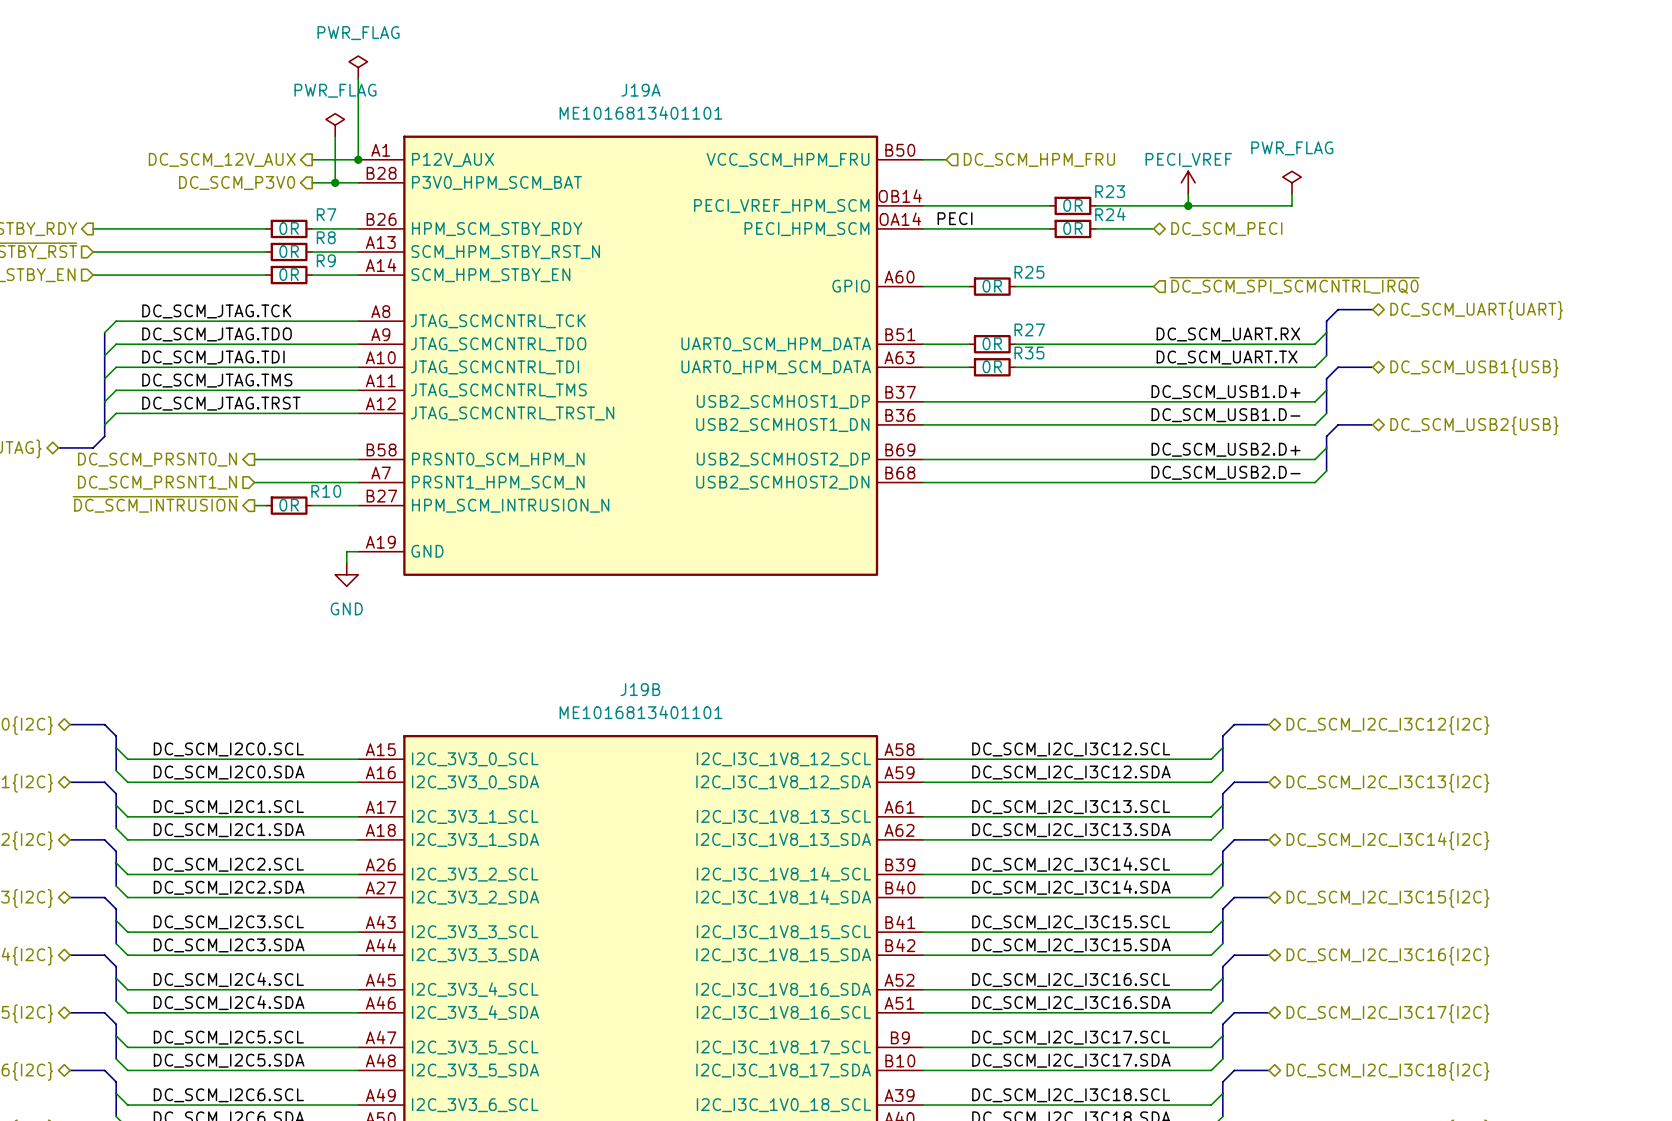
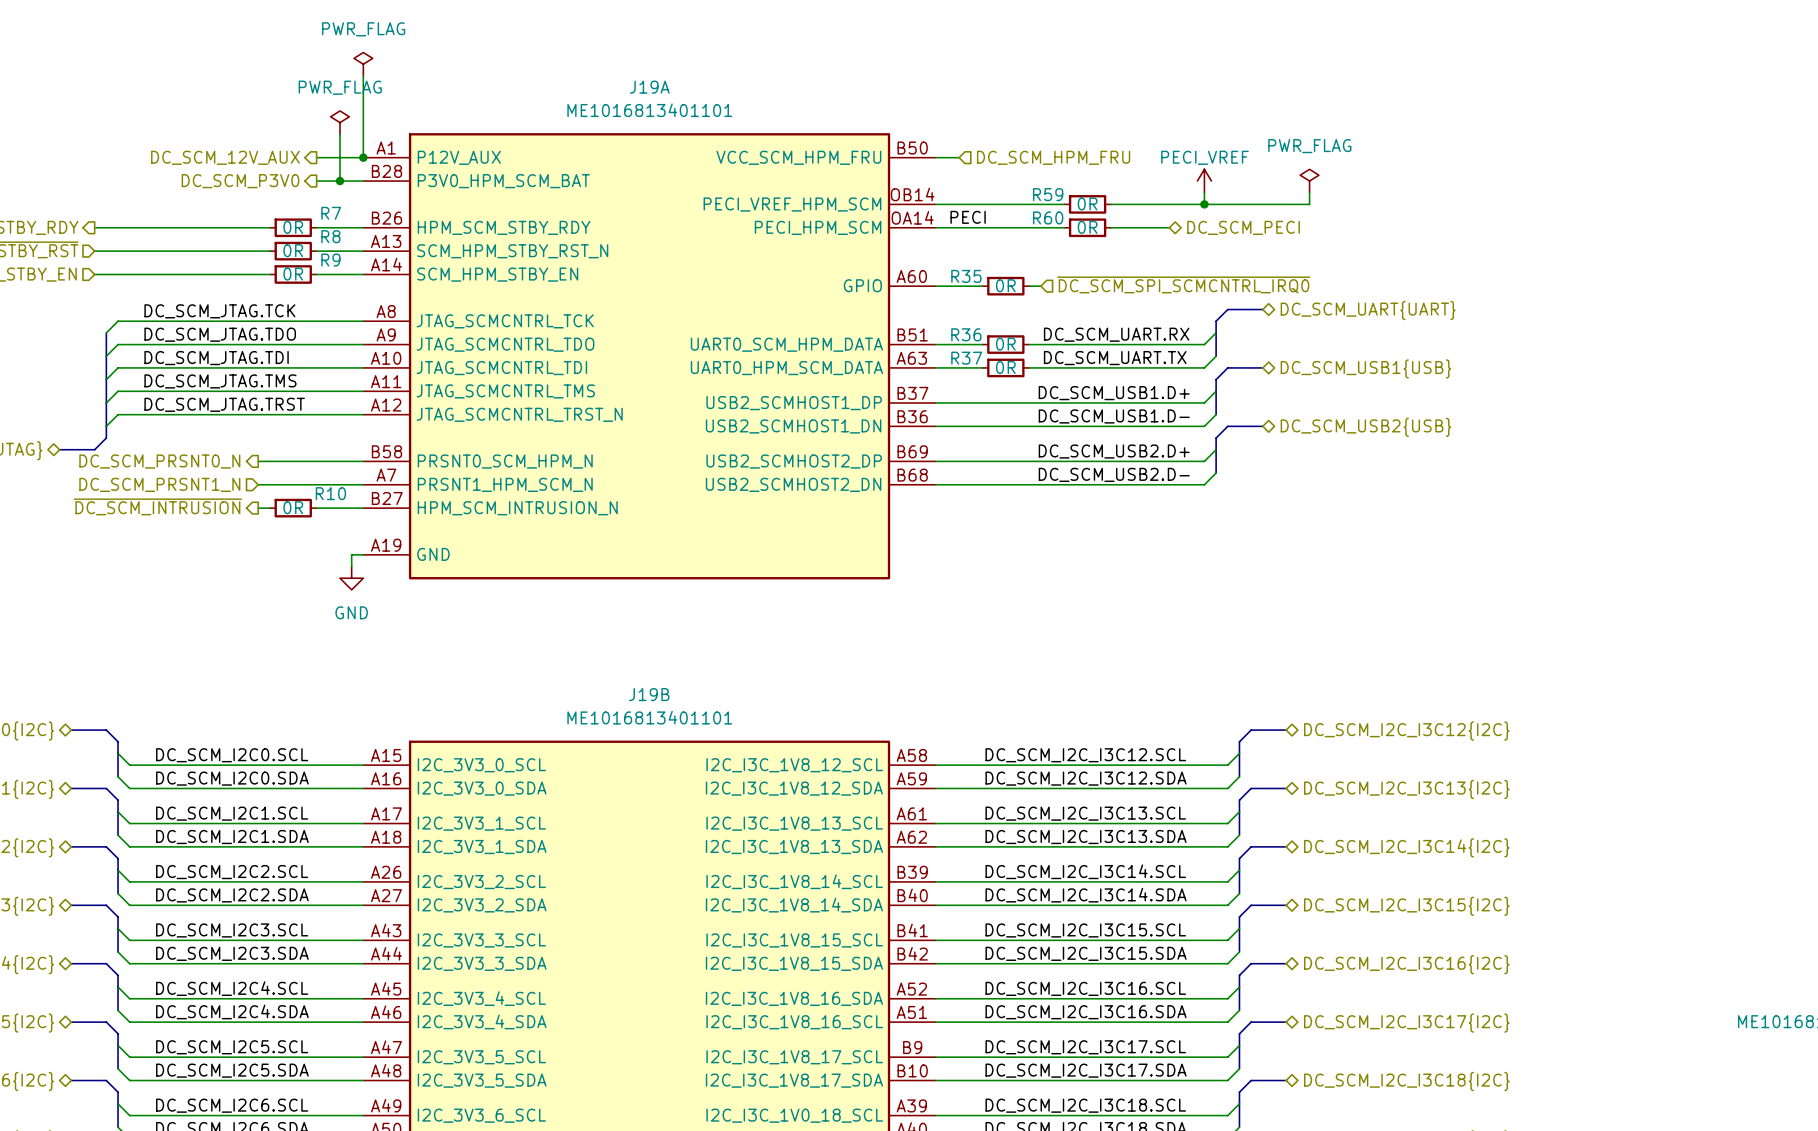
R23 name: R23 (1110, 191) -> R59 (1048, 194)
R24 name: R24 (1110, 214) -> R60 (1048, 217)
R25 name: R25 (1029, 272) -> R35 (966, 276)
hierarchical label position: ~{DC_SCM_SPI_SCMCNTRL_IRQ0} (1294, 285) -> ~{DC_SCM_SPI_SCMCNTRL_IRQ0} (1183, 284)
wire: (1026, 286) (1153, 286) -> none
bus: (1372, 309) (1338, 309) (1326, 321) (1326, 355) -> (1262, 309) (1227, 309) (1216, 321) (1216, 356)
hierarchical label position: DC_SCM_UART{UART} (1476, 310) -> DC_SCM_UART{UART} (1368, 310)
R27 name: R27 (1029, 329) -> R36 (966, 334)
wire: (1326, 332) (1315, 344) (1188, 344) -> (1216, 332) (1204, 344)
label position: DC_SCM_UART.RX (1228, 334) -> DC_SCM_UART.RX (1116, 334)
R35 name: R35 (1029, 353) -> R37 (966, 358)
wire: (1326, 355) (1315, 367) (1188, 367) -> (1216, 356) (1204, 367)
label position: DC_SCM_UART.TX (1227, 357) -> DC_SCM_UART.TX (1115, 358)
bus: (1372, 367) (1338, 367) (1326, 378) (1326, 413) -> (1262, 367) (1227, 367) (1216, 379) (1216, 414)
hierarchical label position: DC_SCM_USB1{USB} (1474, 368) -> DC_SCM_USB1{USB} (1365, 368)
wire: (1326, 390) (1315, 401) (1188, 401) -> (1216, 391) (1204, 402)
label position: DC_SCM_USB1.D+ (1226, 392) -> DC_SCM_USB1.D+ (1114, 393)
wire: (1326, 413) (1315, 424) (1188, 424) -> (1216, 414) (1204, 426)
label position: DC_SCM_USB1.D- (1226, 415) -> DC_SCM_USB1.D- (1114, 416)
bus: (1372, 424) (1338, 424) (1326, 436) (1326, 471) -> (1262, 426) (1227, 426) (1216, 438) (1216, 473)
hierarchical label position: DC_SCM_USB2{USB} (1474, 425) -> DC_SCM_USB2{USB} (1365, 427)
wire: (1326, 447) (1315, 459) (1188, 459) -> (1216, 449) (1204, 461)
label position: DC_SCM_USB2.D+ (1226, 449) -> DC_SCM_USB2.D+ (1114, 451)
wire: (1326, 471) (1315, 482) (1188, 482) -> (1216, 473) (1204, 484)
label position: DC_SCM_USB2.D- (1226, 472) -> DC_SCM_USB2.D- (1114, 474)

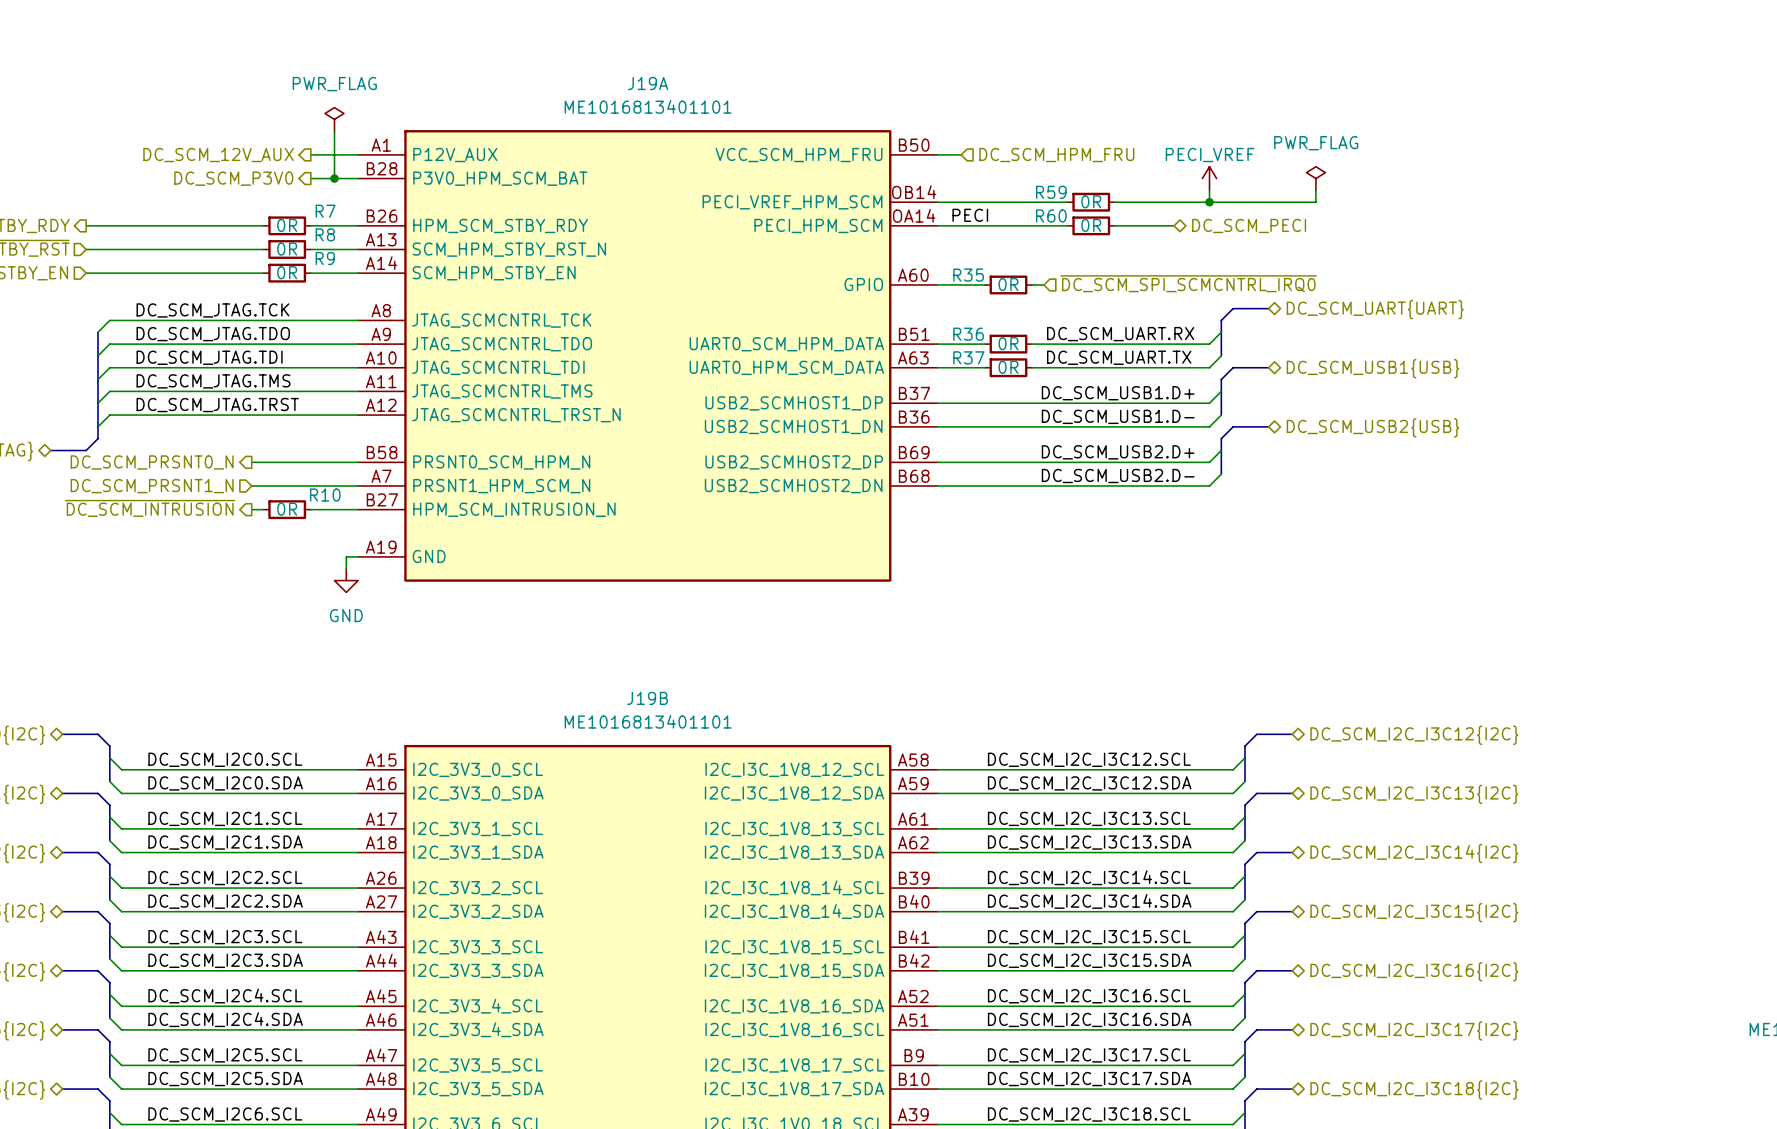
power symbol: PWR_FLAG (363, 64) -> none
wire: (363, 75) (363, 157) -> none
junction: (363, 157) -> none

